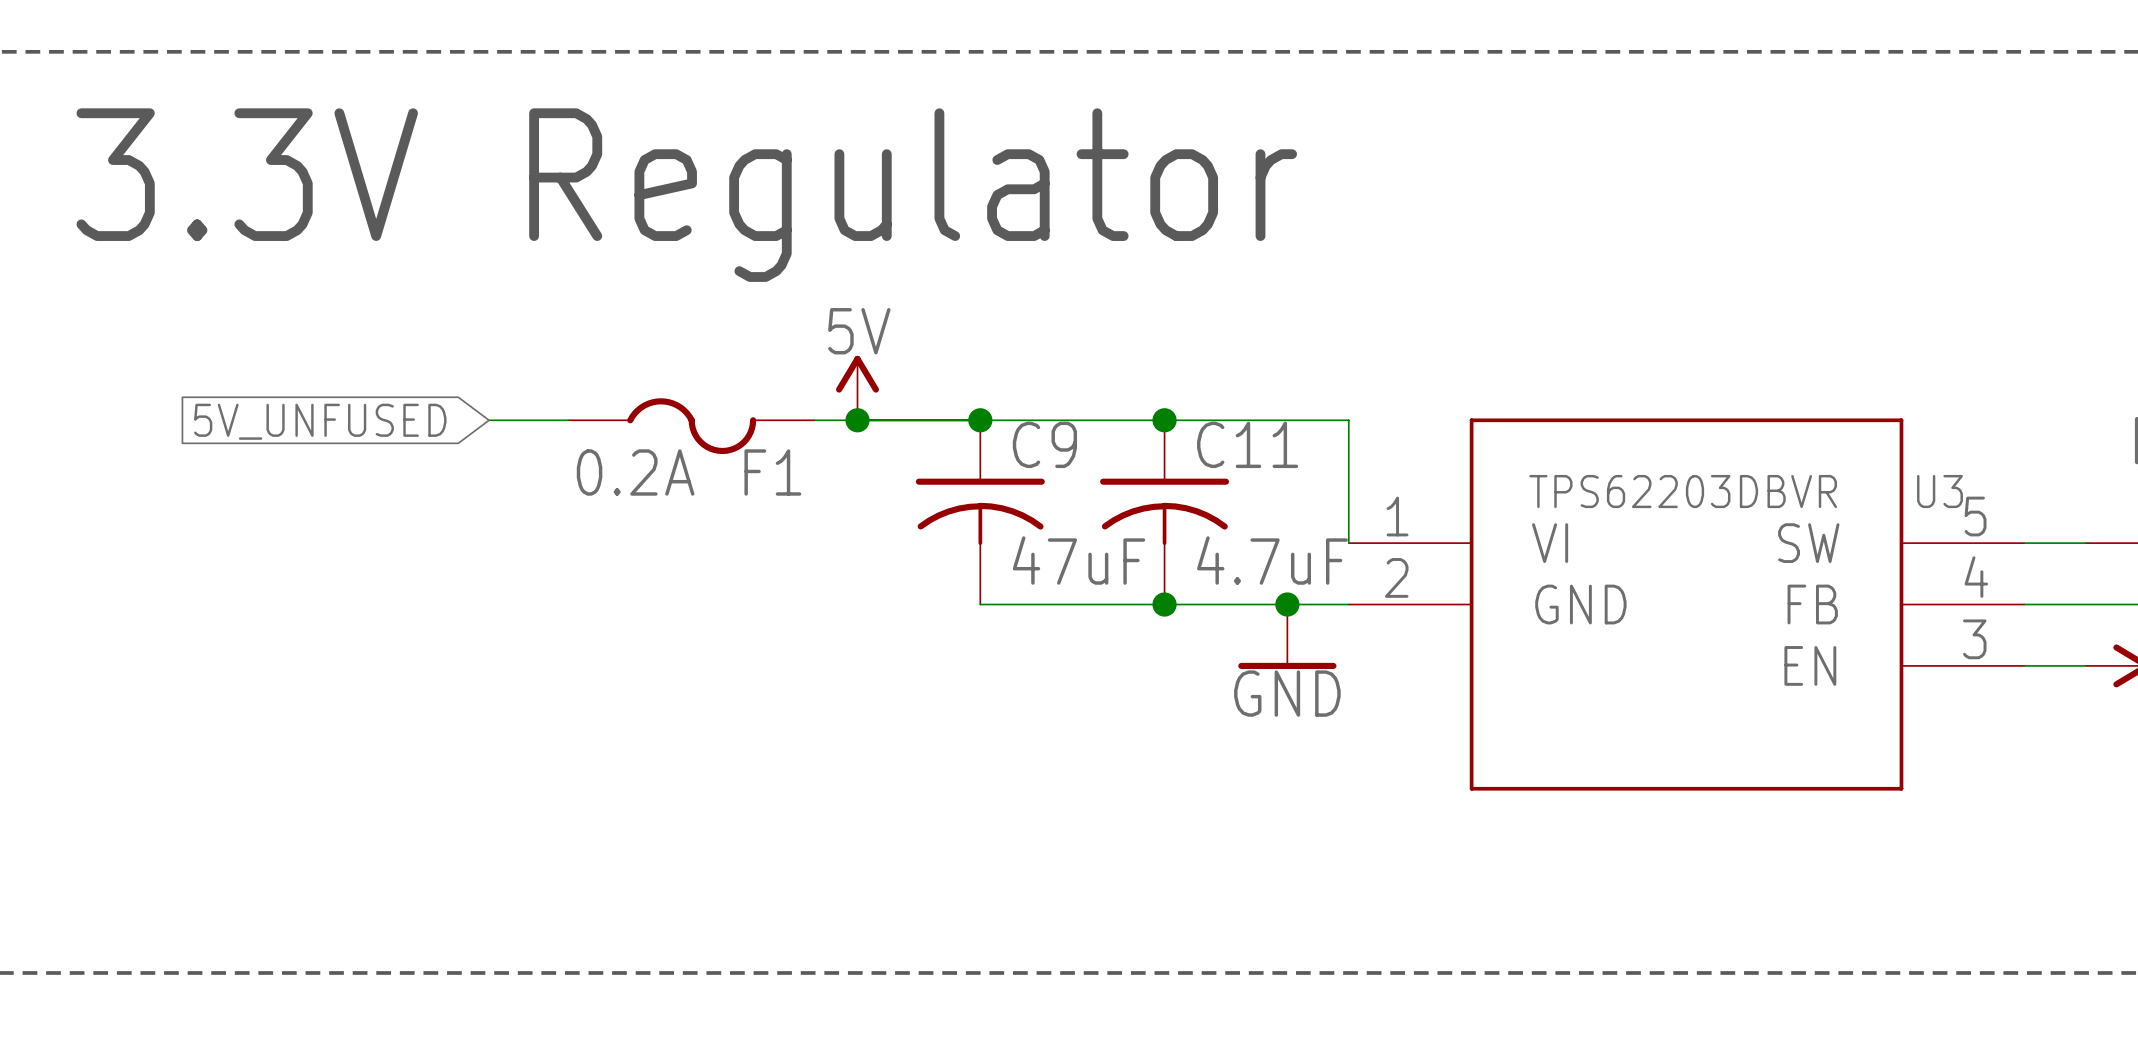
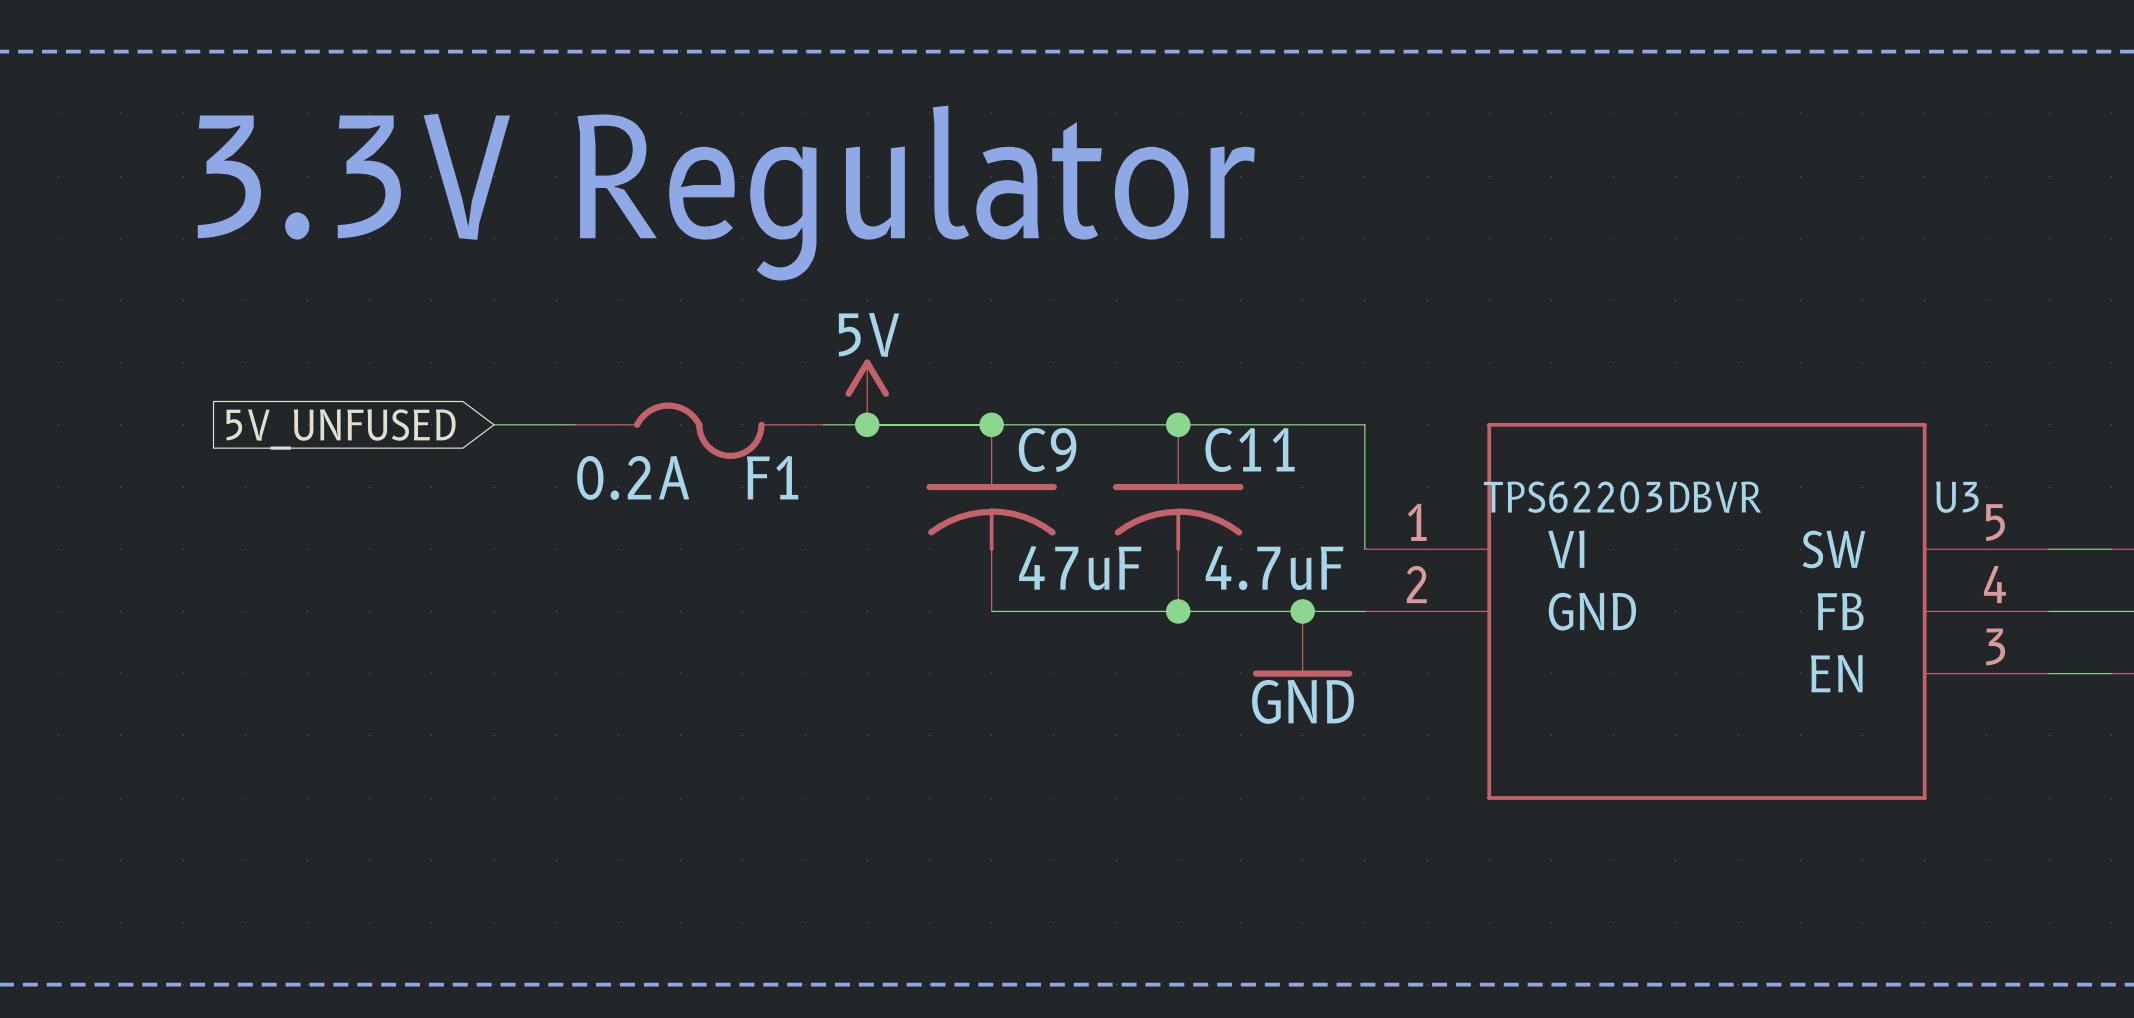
text position: 3.3V Regulator (686, 195) -> 3.3V Regulator (726, 193)
U3 value position: TPS62203DBVR (1683, 491) -> TPS62203DBVR (1622, 497)

